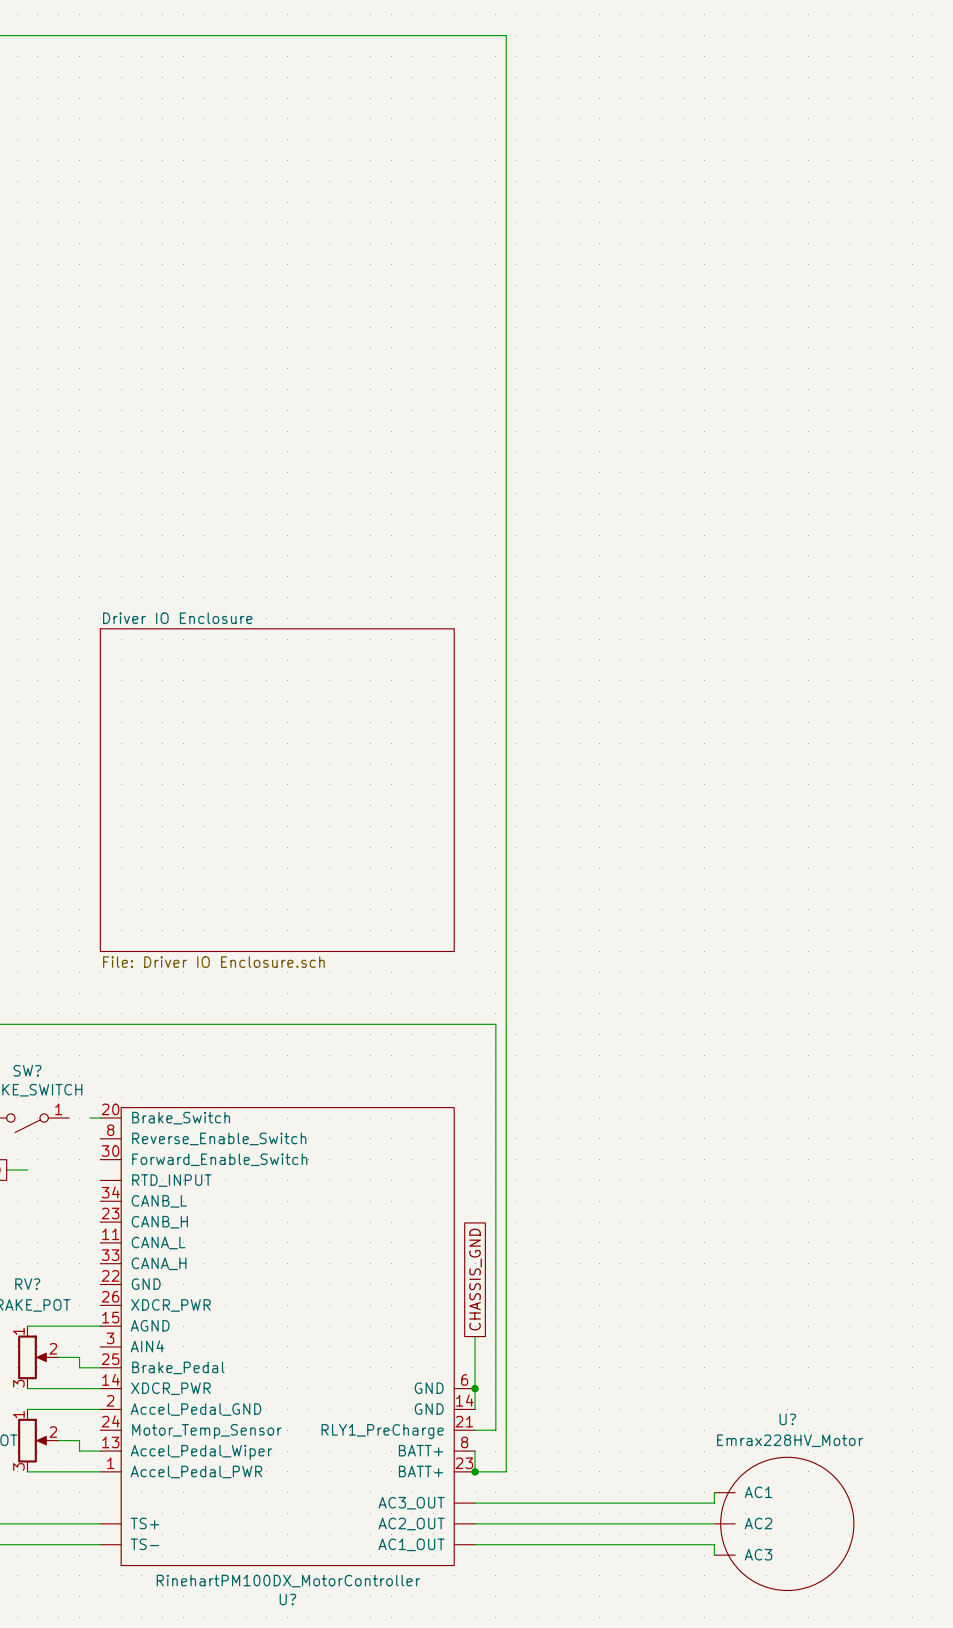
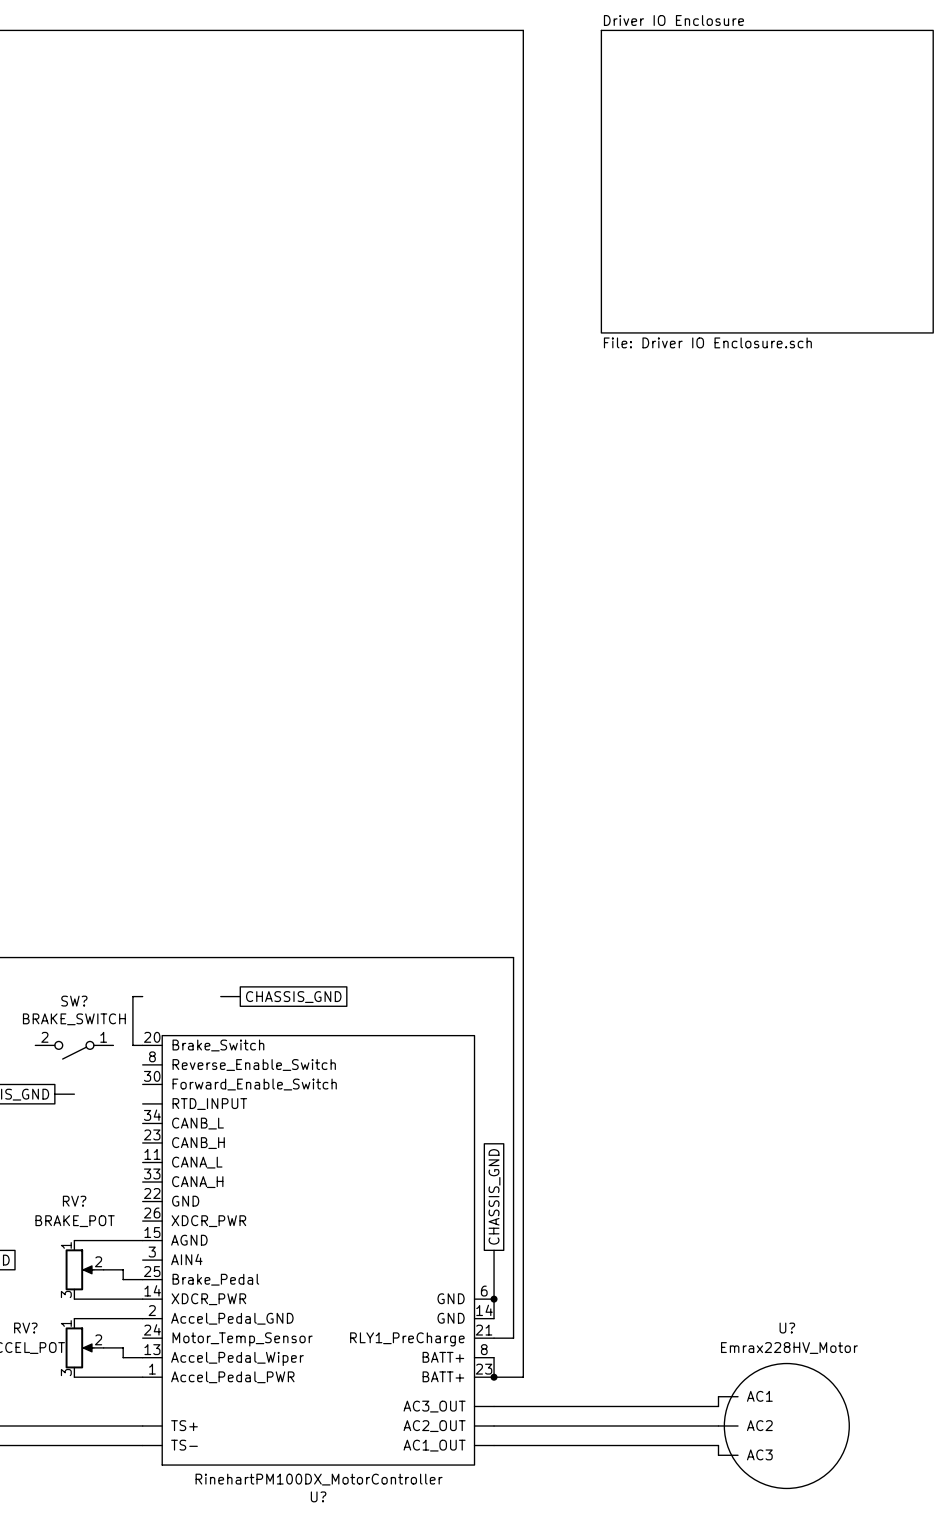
sheet Driver IO Enclosure: none -> File: Driver IO Enclosure.sch (767, 181)
sheet Driver IO Enclosure: File: Driver IO Enclosure.sch (277, 790) -> none
wire: none -> (142, 996) (132, 996) (132, 1045)
wire: none -> (220, 996) (240, 996)
global label: none -> CHASSIS_GND (293, 997)

